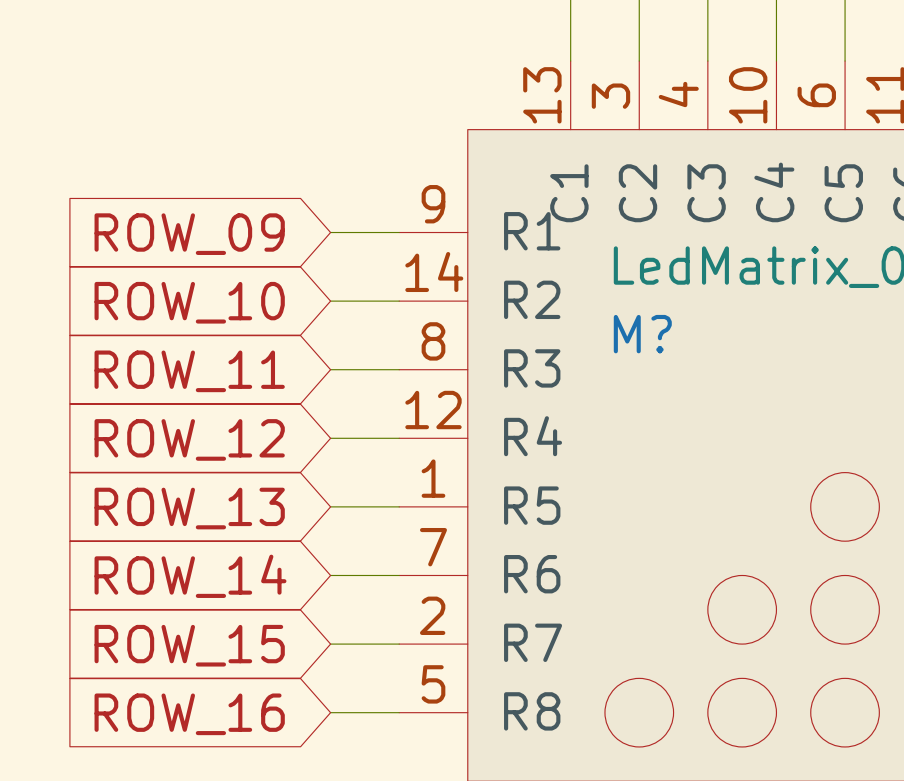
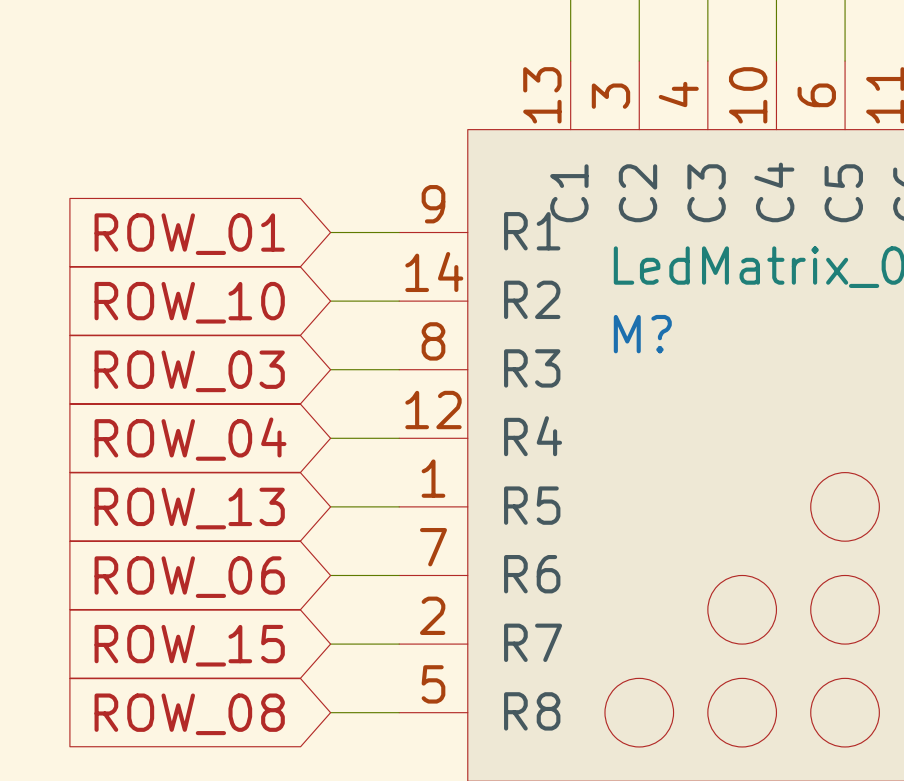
global label: ROW_09 (189, 234) -> ROW_01 (189, 234)
global label: ROW_11 (189, 371) -> ROW_03 (189, 371)
global label: ROW_12 (189, 439) -> ROW_04 (190, 439)
global label: ROW_14 (190, 576) -> ROW_06 (189, 577)
global label: ROW_16 (189, 714) -> ROW_08 (189, 714)

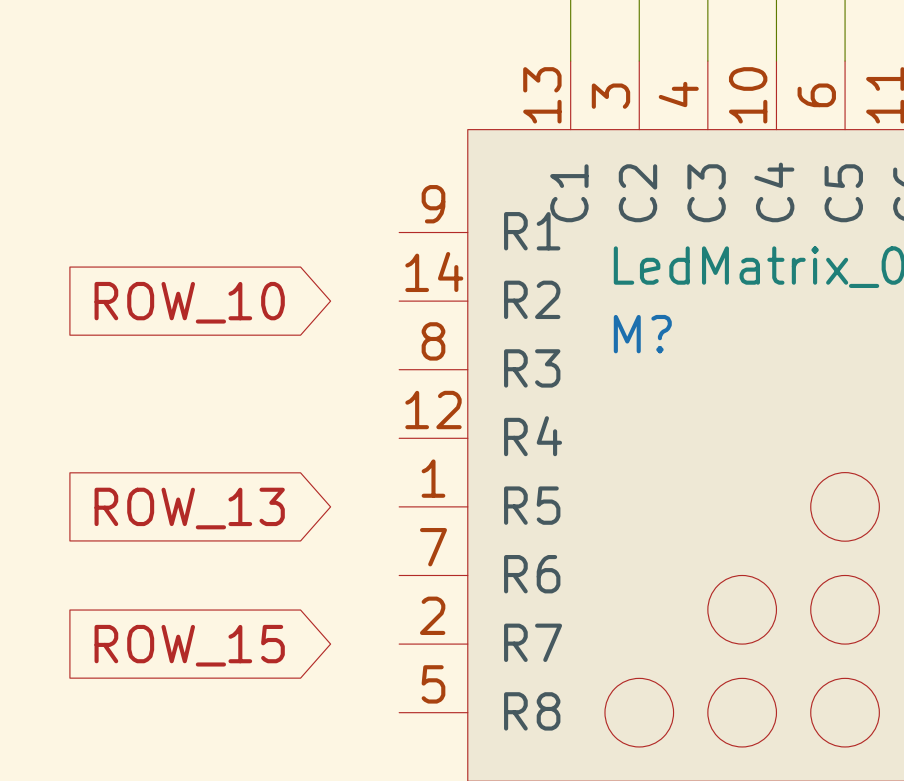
wire: (330, 232) (399, 232) -> none
global label: ROW_01 (189, 234) -> none
wire: (330, 301) (399, 301) -> none
wire: (330, 369) (399, 369) -> none
global label: ROW_03 (189, 371) -> none
wire: (330, 438) (399, 438) -> none
global label: ROW_04 (190, 439) -> none
wire: (330, 506) (399, 506) -> none
wire: (330, 575) (399, 575) -> none
global label: ROW_06 (189, 577) -> none
wire: (330, 644) (399, 644) -> none
wire: (330, 712) (399, 712) -> none
global label: ROW_08 (189, 714) -> none

